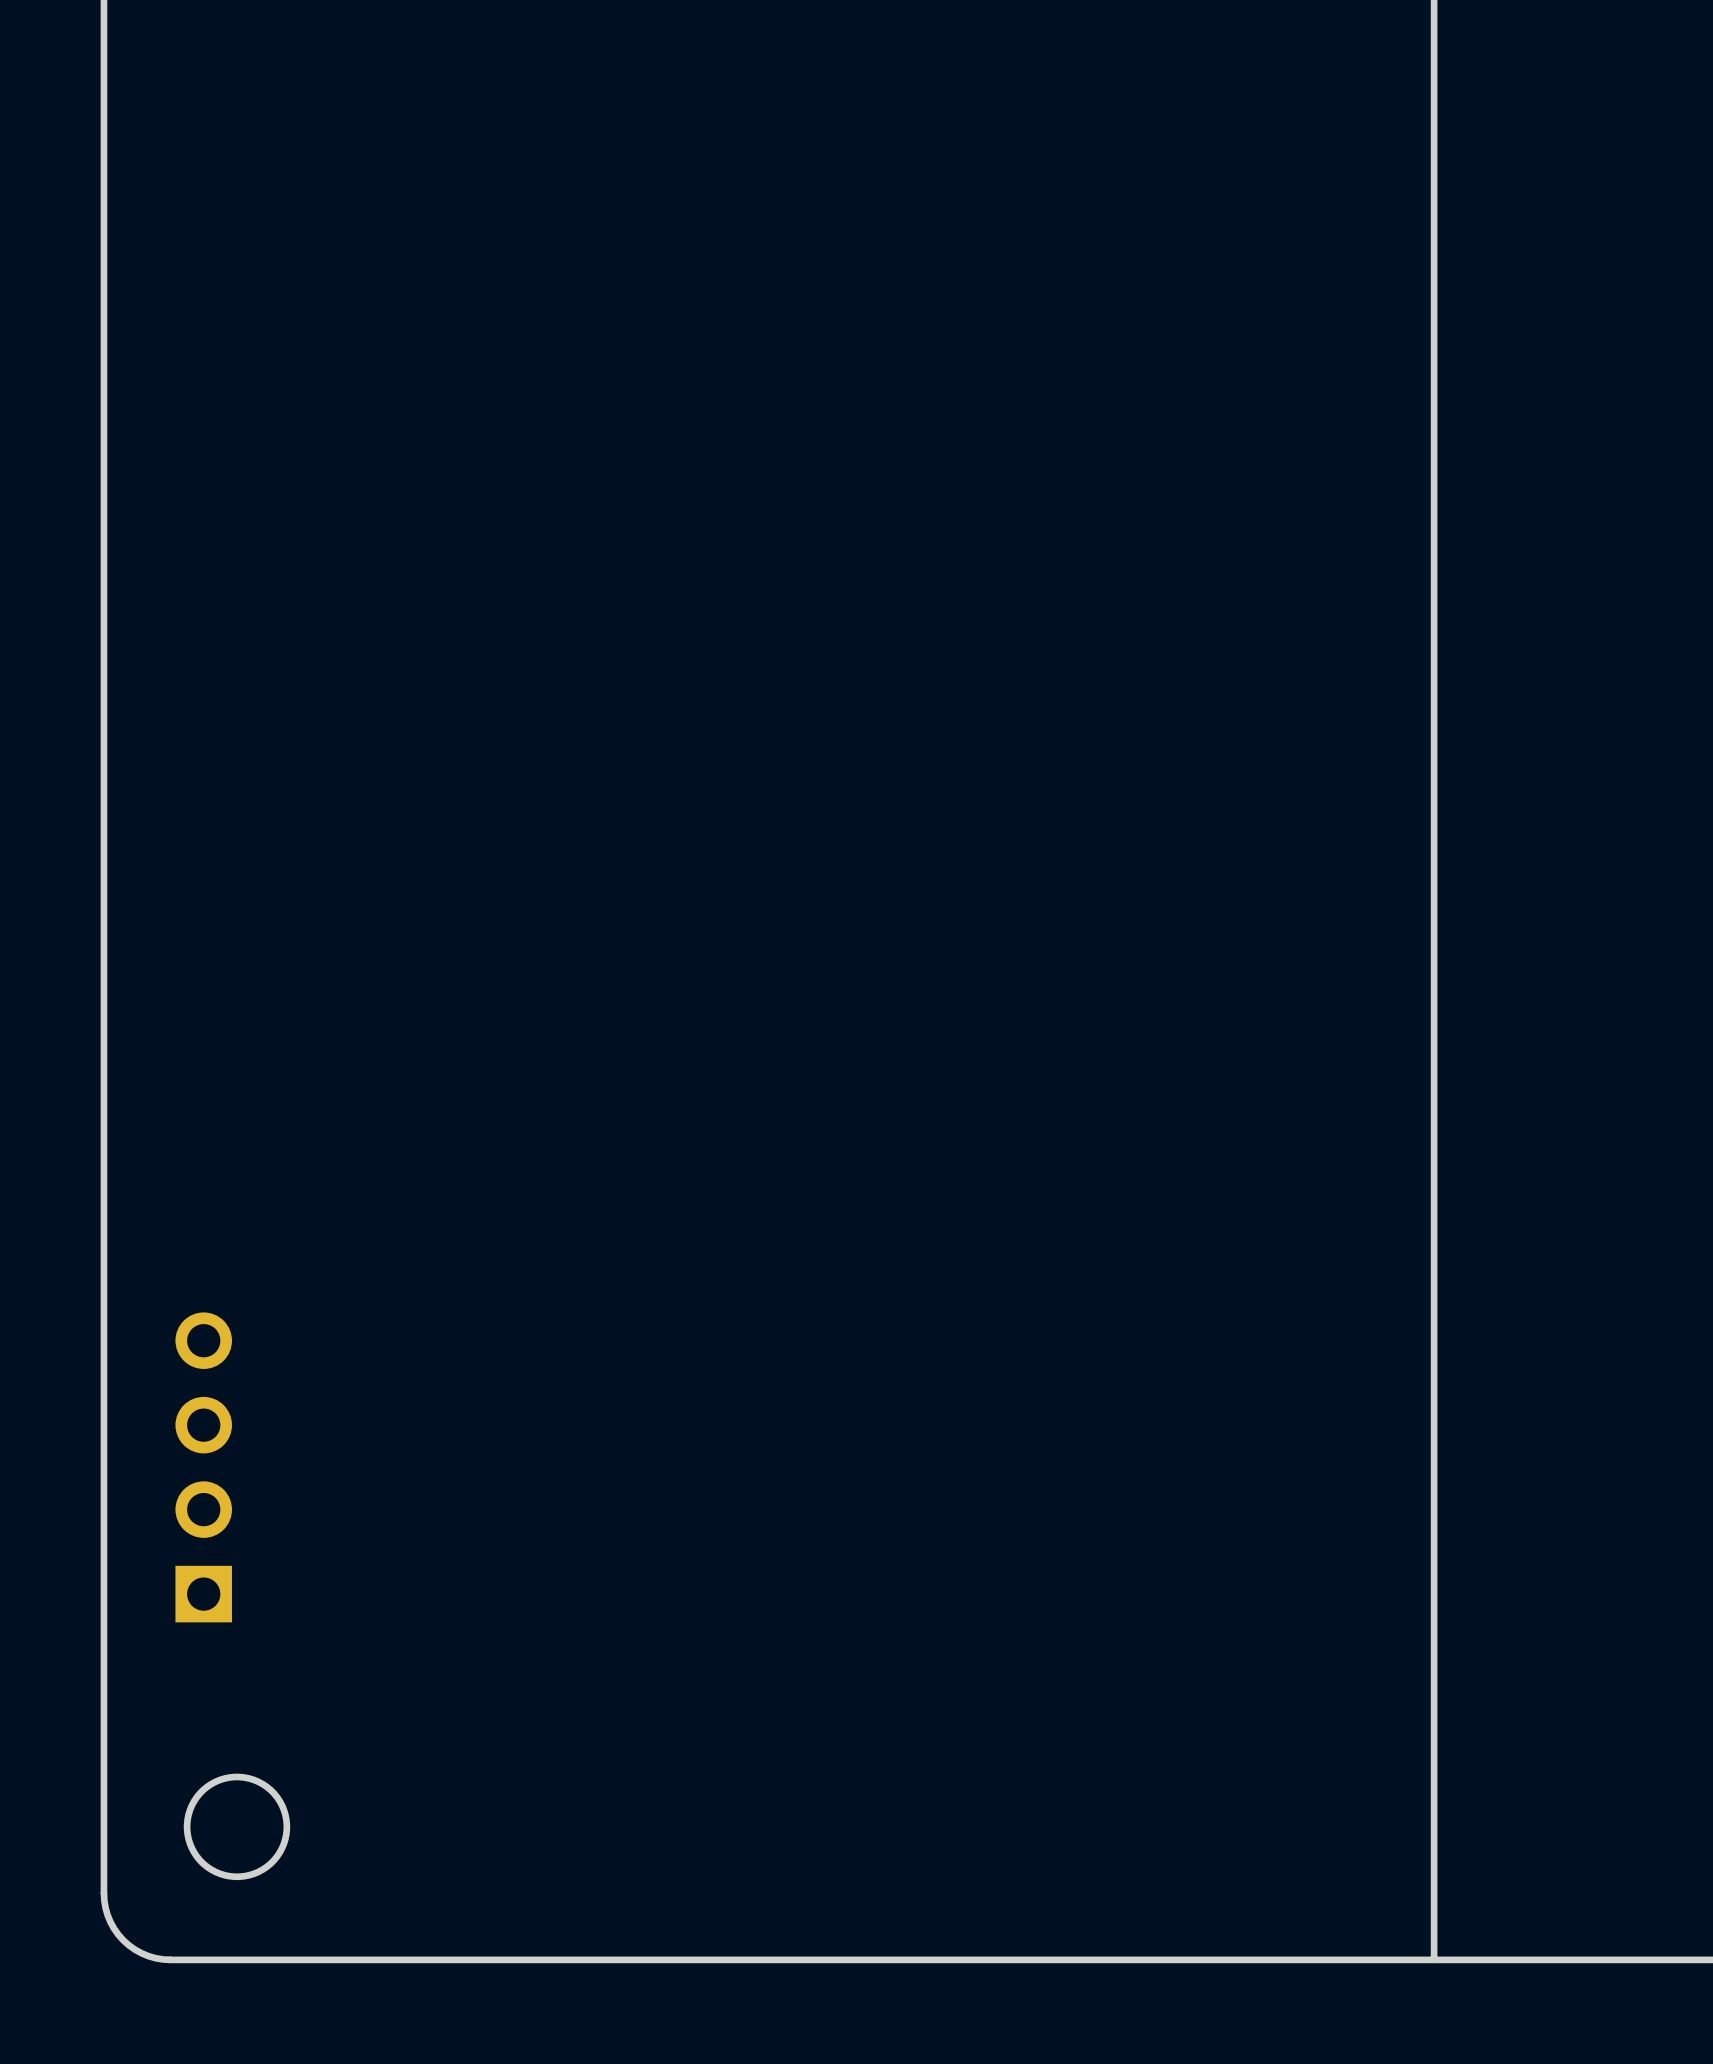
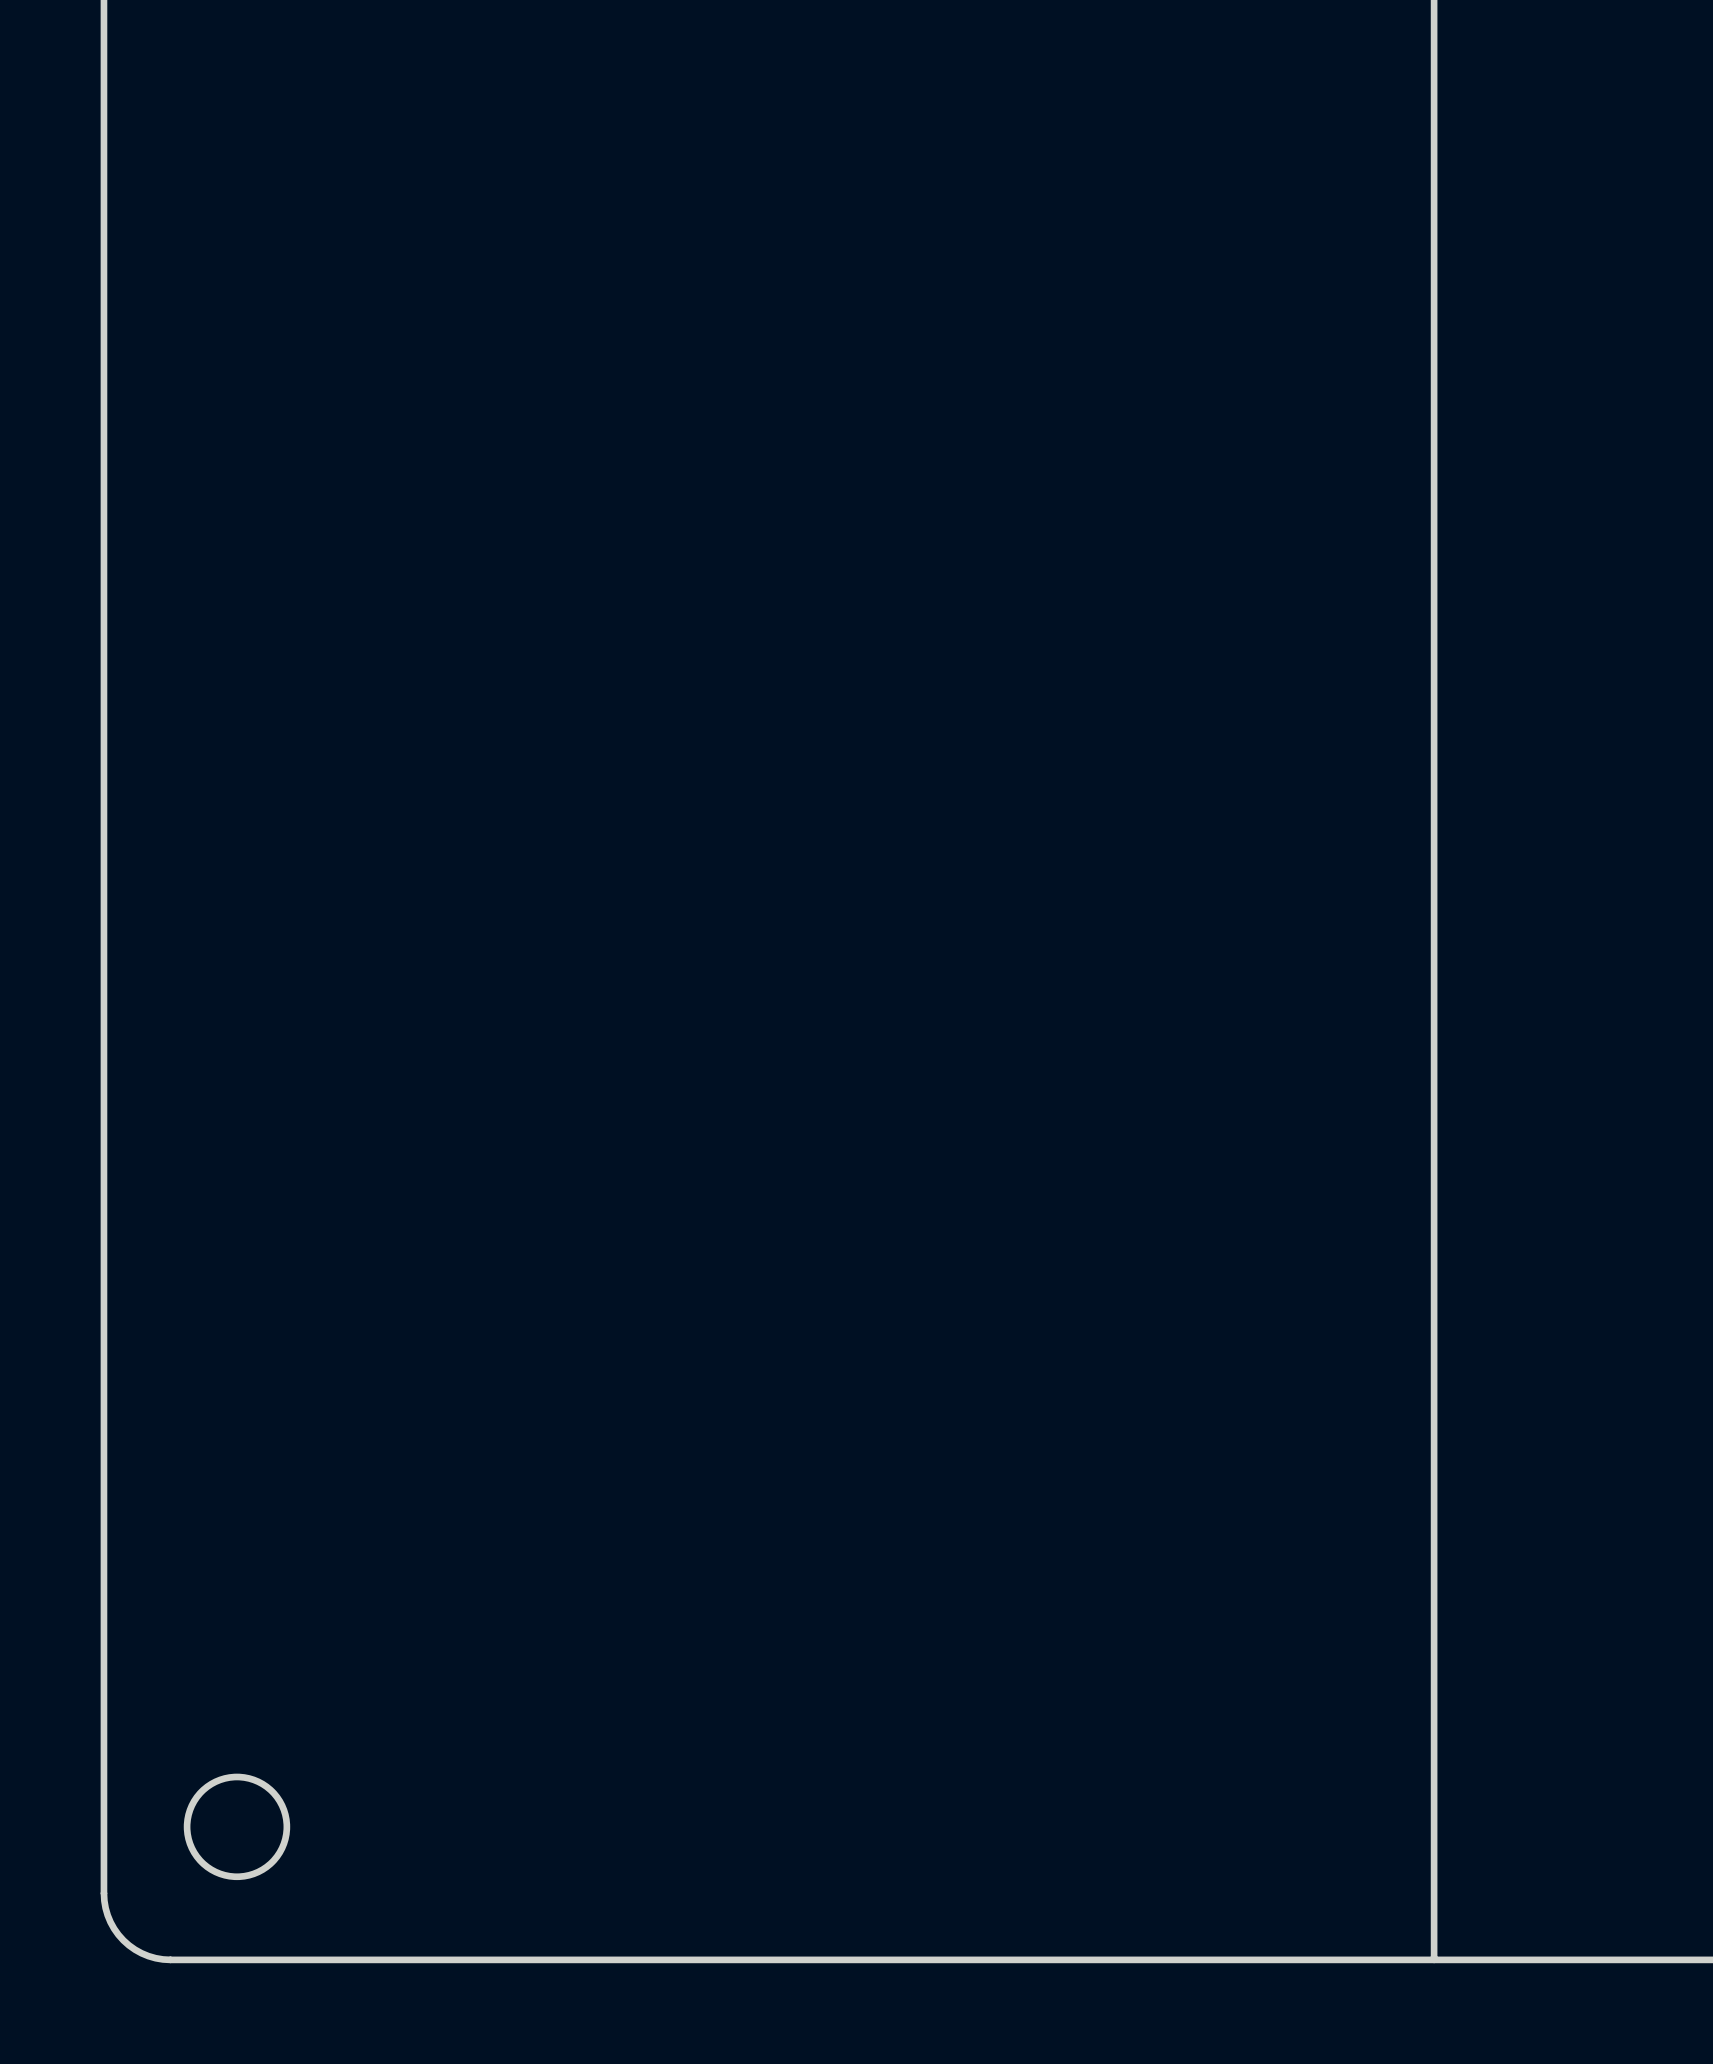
part: (203, 1467) -> none

